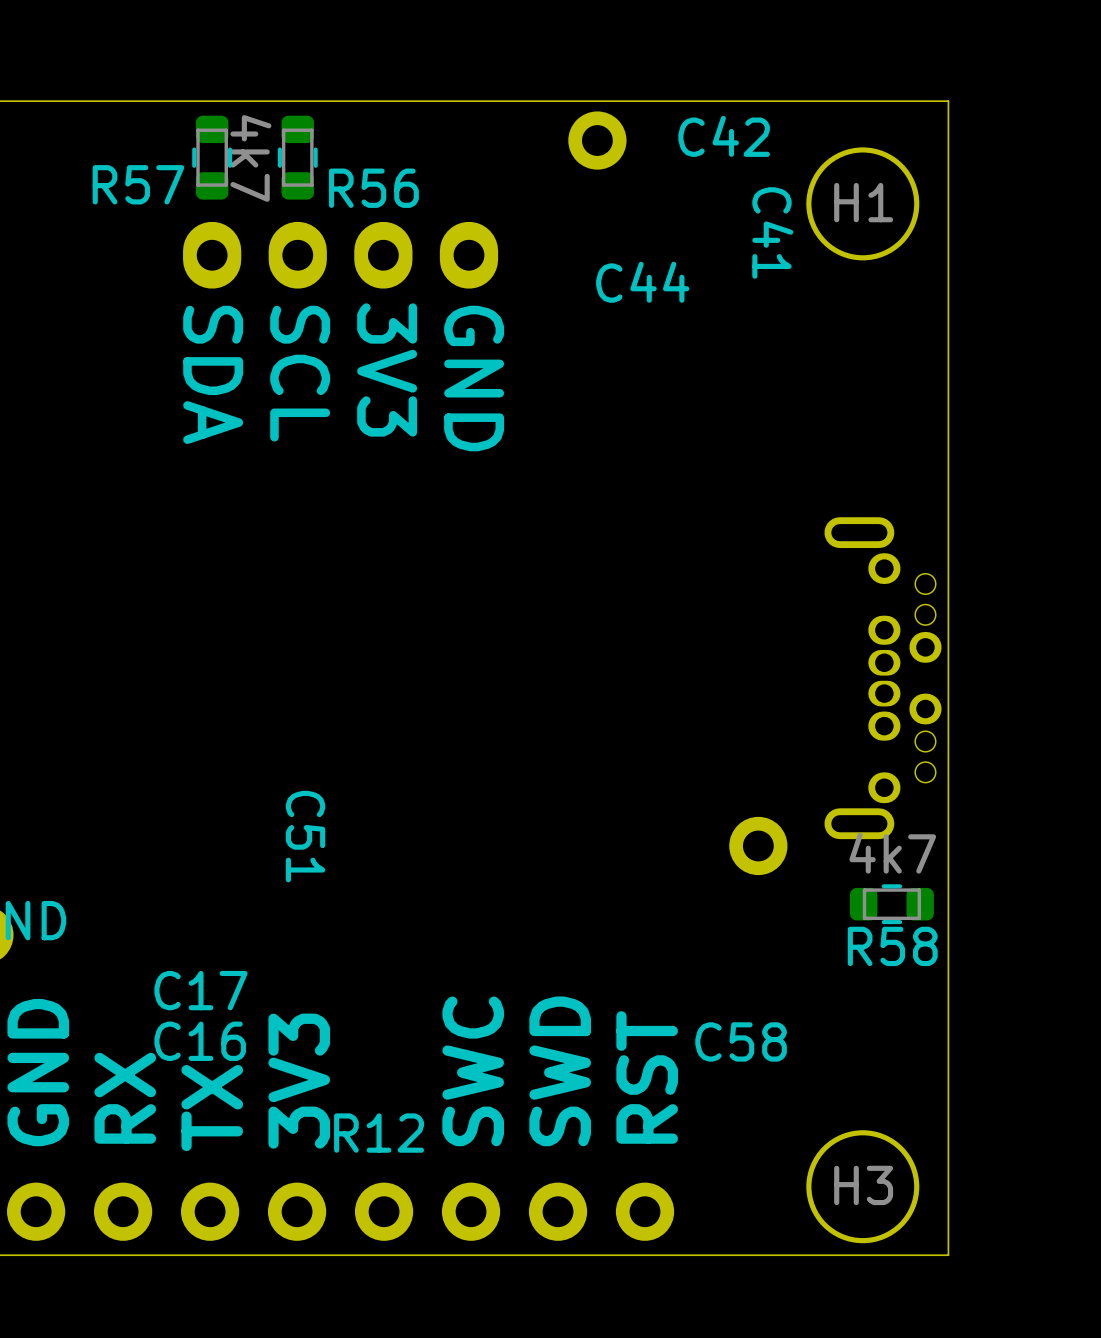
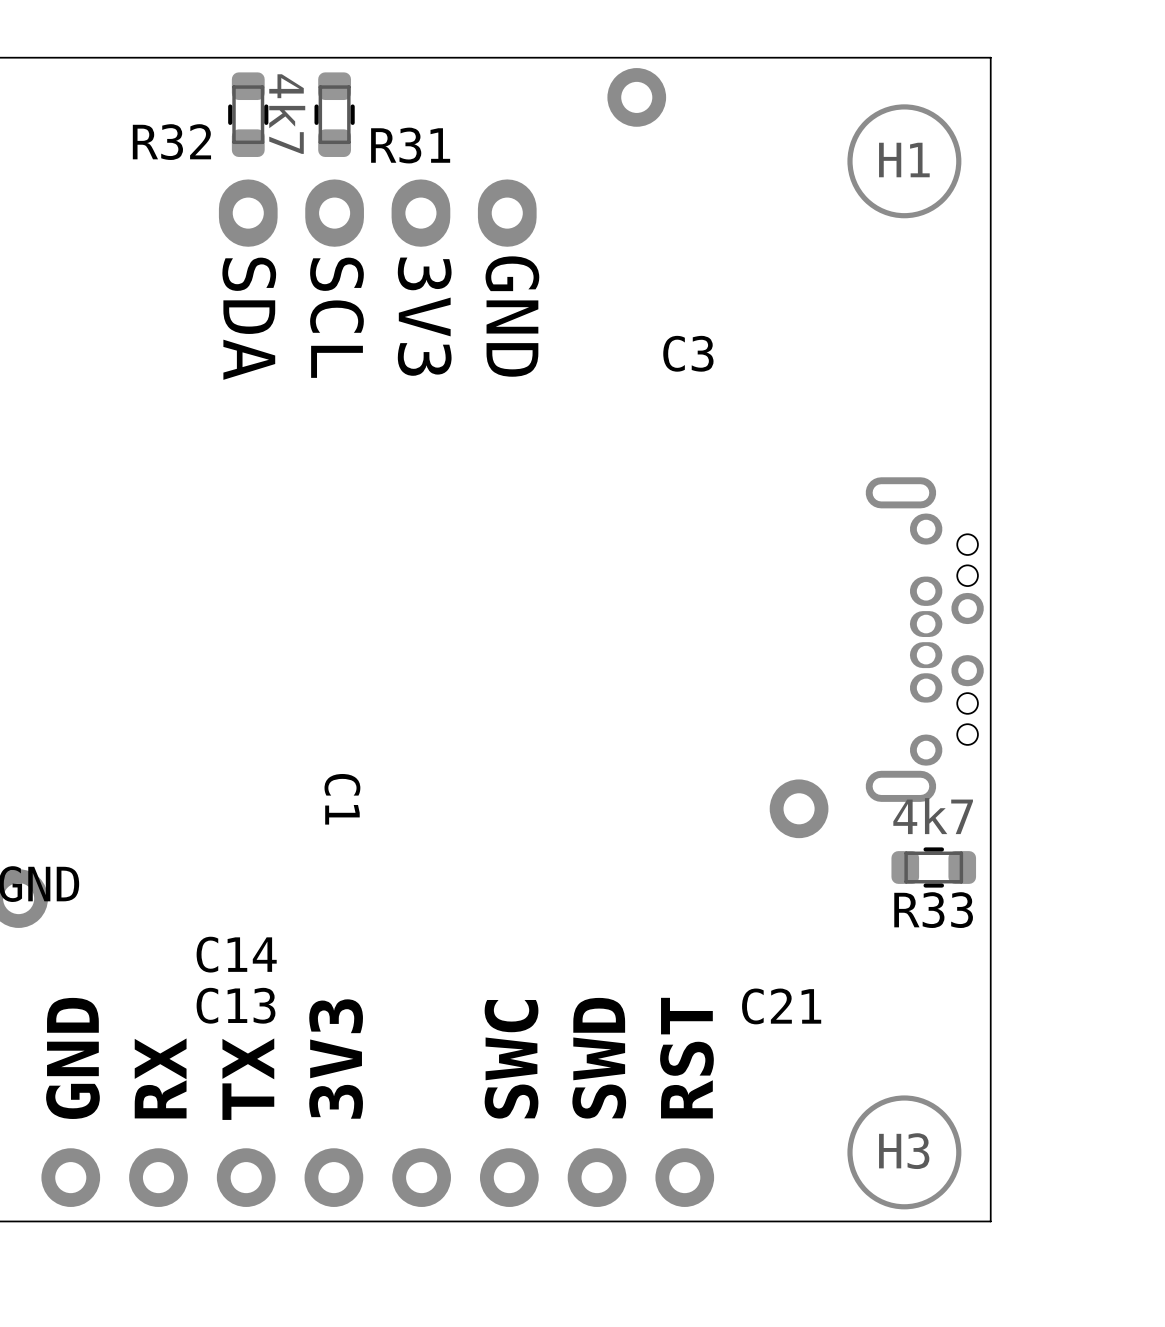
C42: (724, 136) -> none
R57 name: R57 (138, 184) -> R32 (171, 142)
R56 name: R56 (373, 188) -> R31 (410, 145)
C41: (772, 232) -> none
C44: (642, 282) -> none
C3: none -> (688, 353)
C51 name: C51 (305, 836) -> C1 (342, 799)
R58 name: R58 (892, 946) -> R33 (933, 910)
C17 name: C17 (200, 990) -> C14 (236, 954)
C16 name: C16 (200, 1041) -> C13 (236, 1005)
C58 name: C58 (741, 1041) -> C21 (781, 1006)
R12: (379, 1133) -> none

